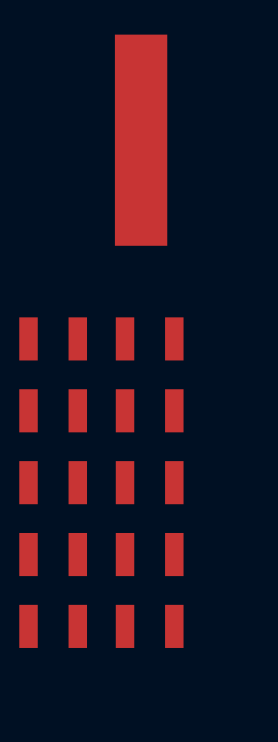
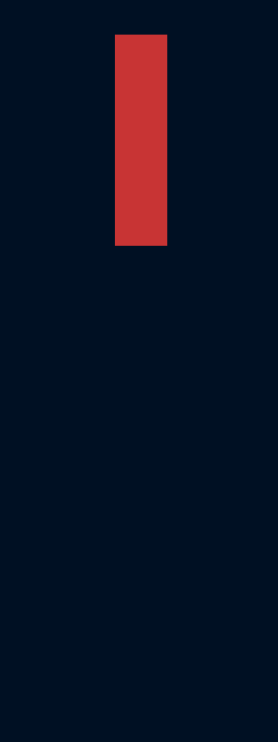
part: (53, 338) -> none
part: (149, 338) -> none
part: (53, 410) -> none
part: (149, 410) -> none
part: (53, 482) -> none
part: (149, 482) -> none
part: (53, 554) -> none
part: (149, 554) -> none
part: (53, 626) -> none
part: (149, 626) -> none

